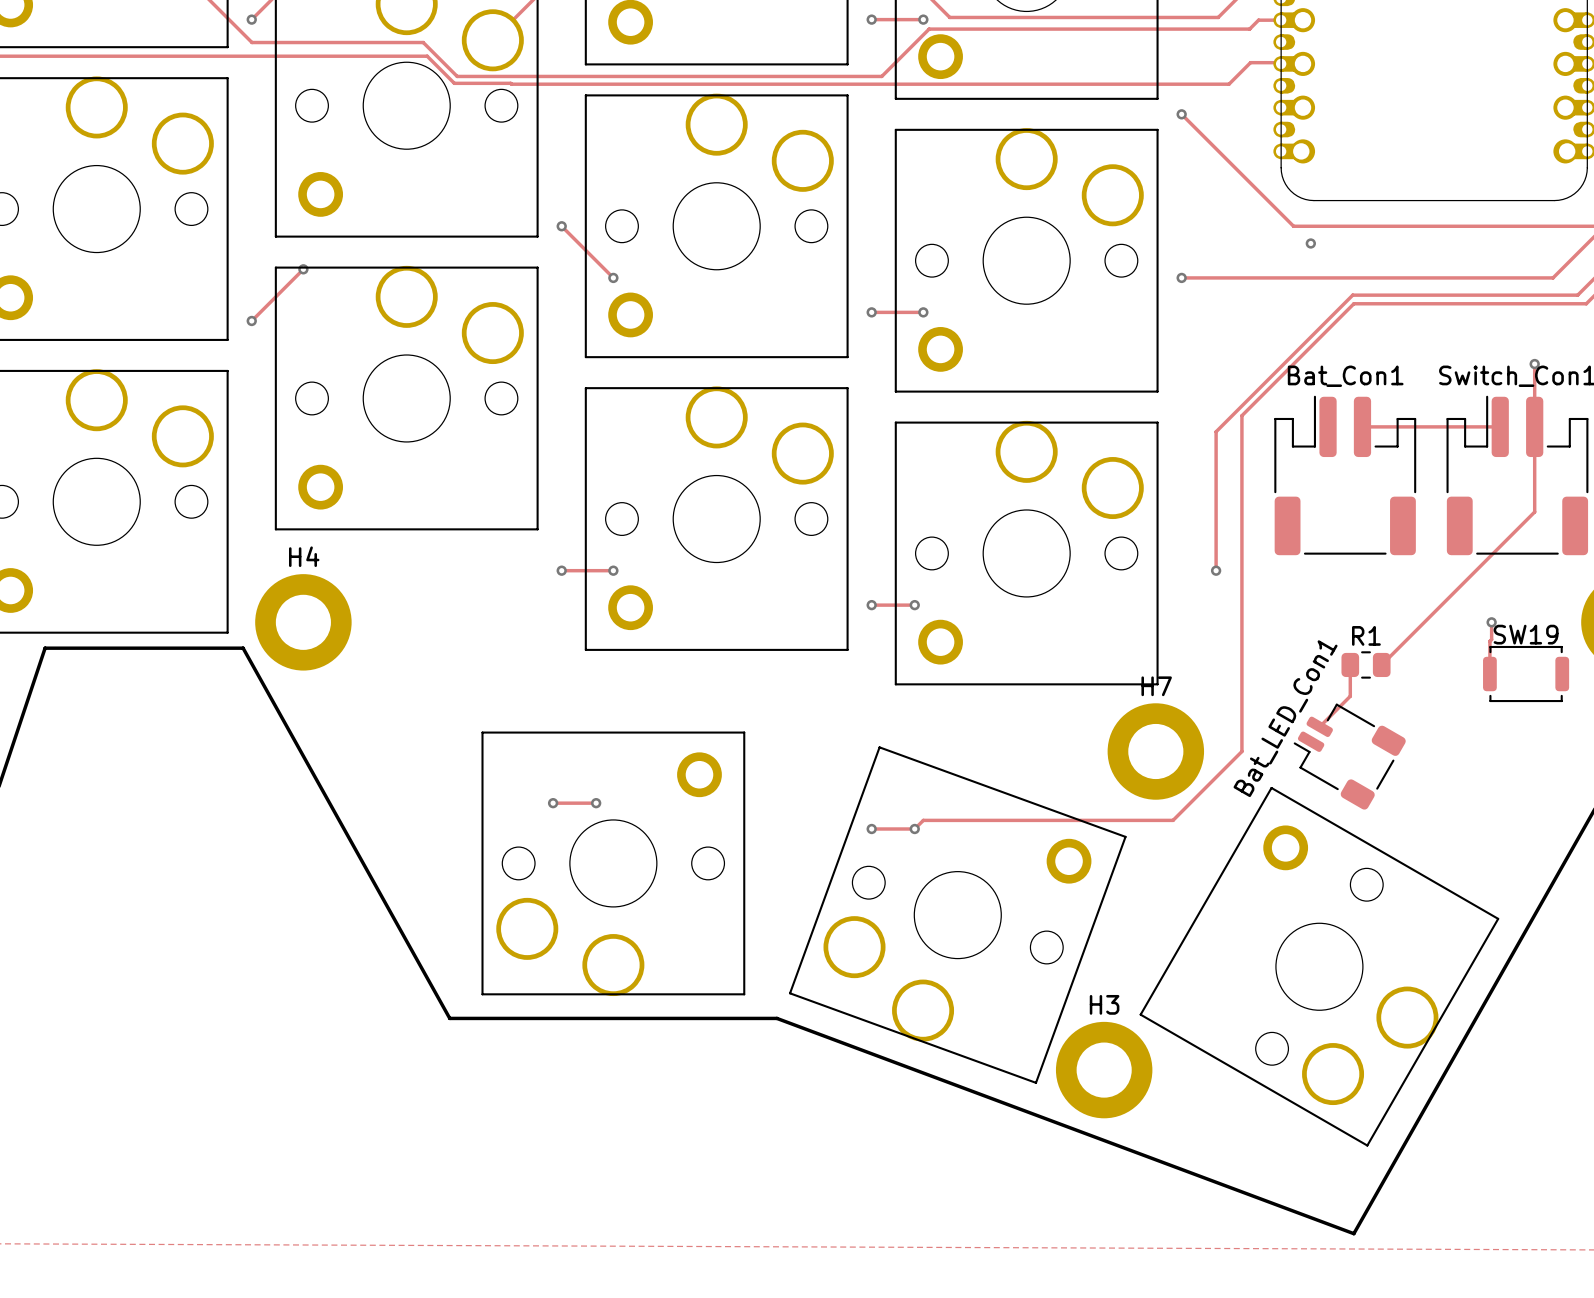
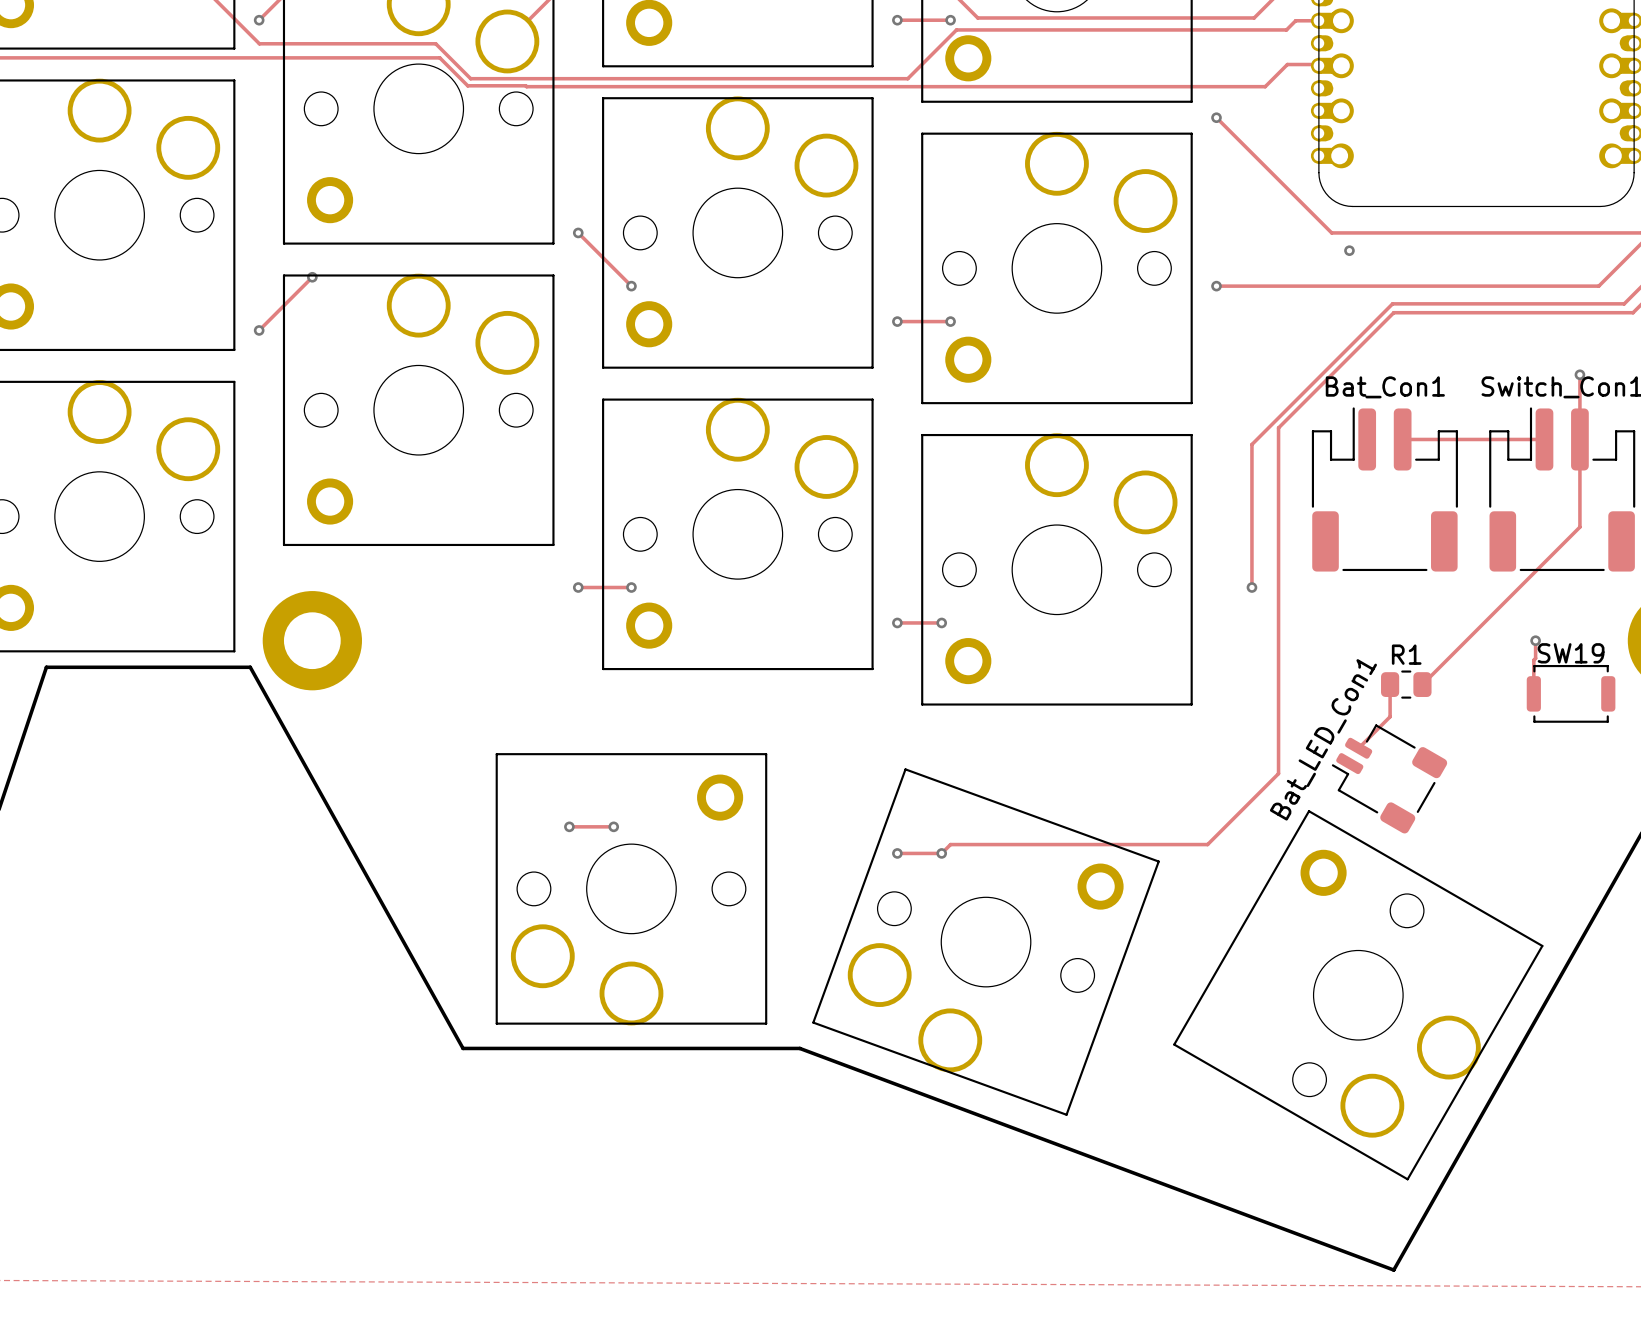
H4 name: H4 (304, 556) -> none
H7: (1155, 751) -> none
H3: (1104, 1070) -> none

